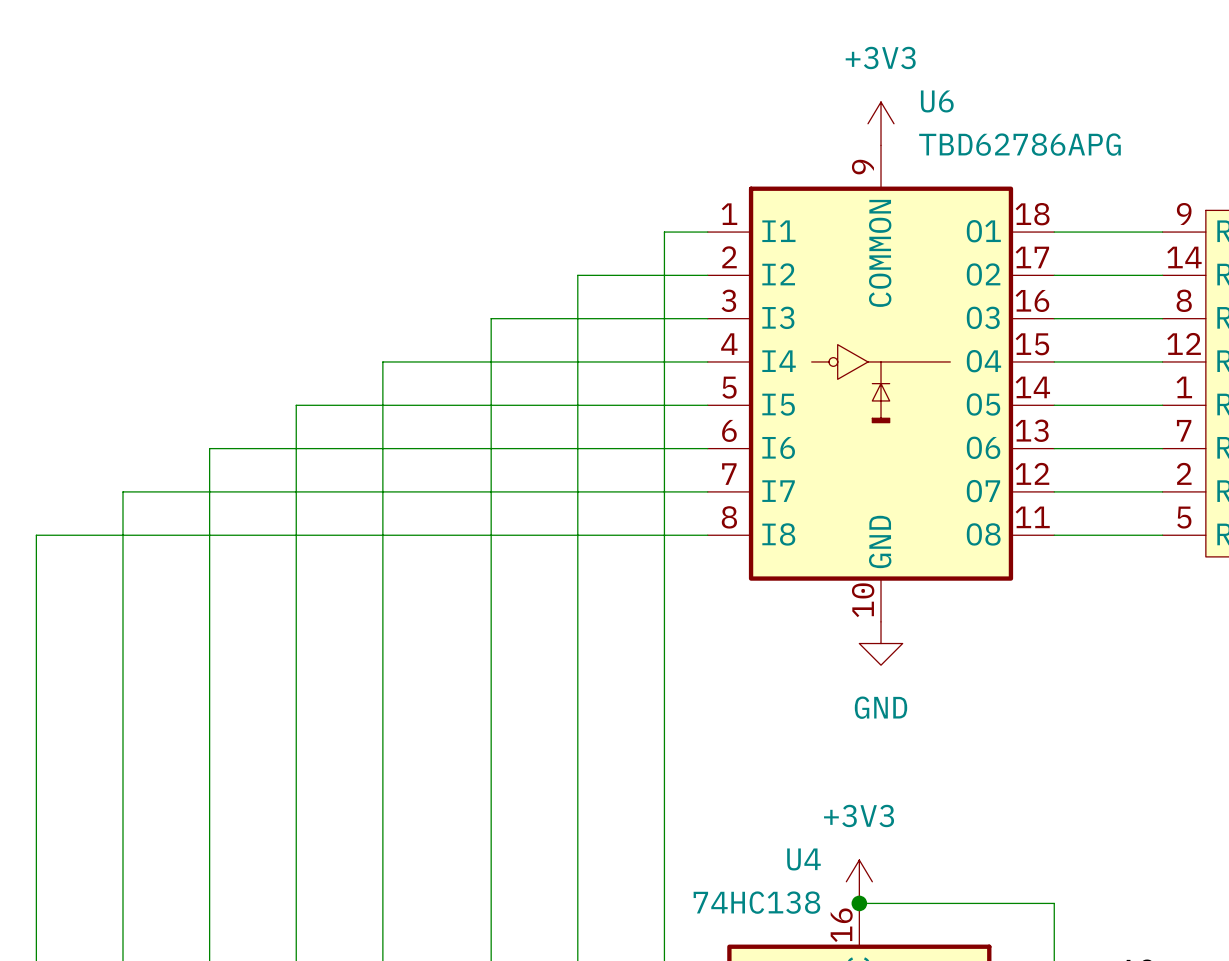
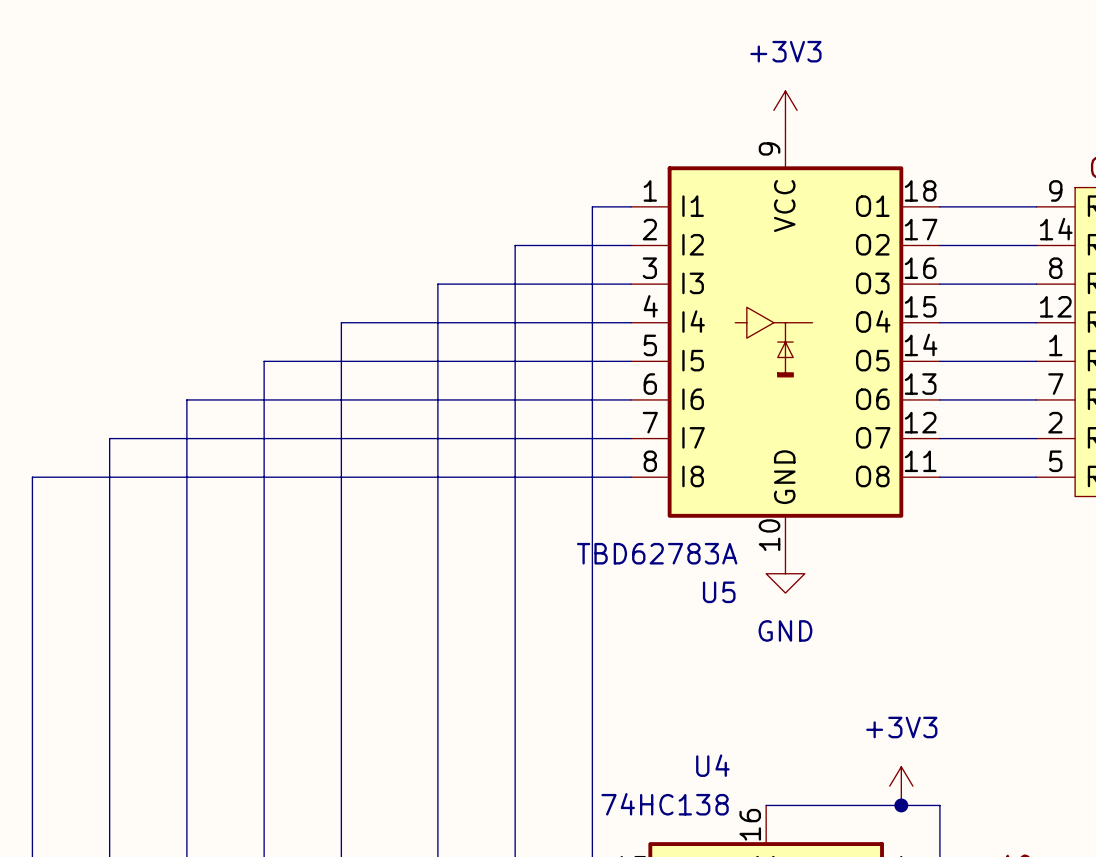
U6: TBD62786APG (881, 383) -> none
U5: none -> TBD62783A (785, 342)
power symbol position: +3V3 (859, 881) -> +3V3 (901, 786)
junction: (859, 903) -> none
junction: none -> (901, 805)

